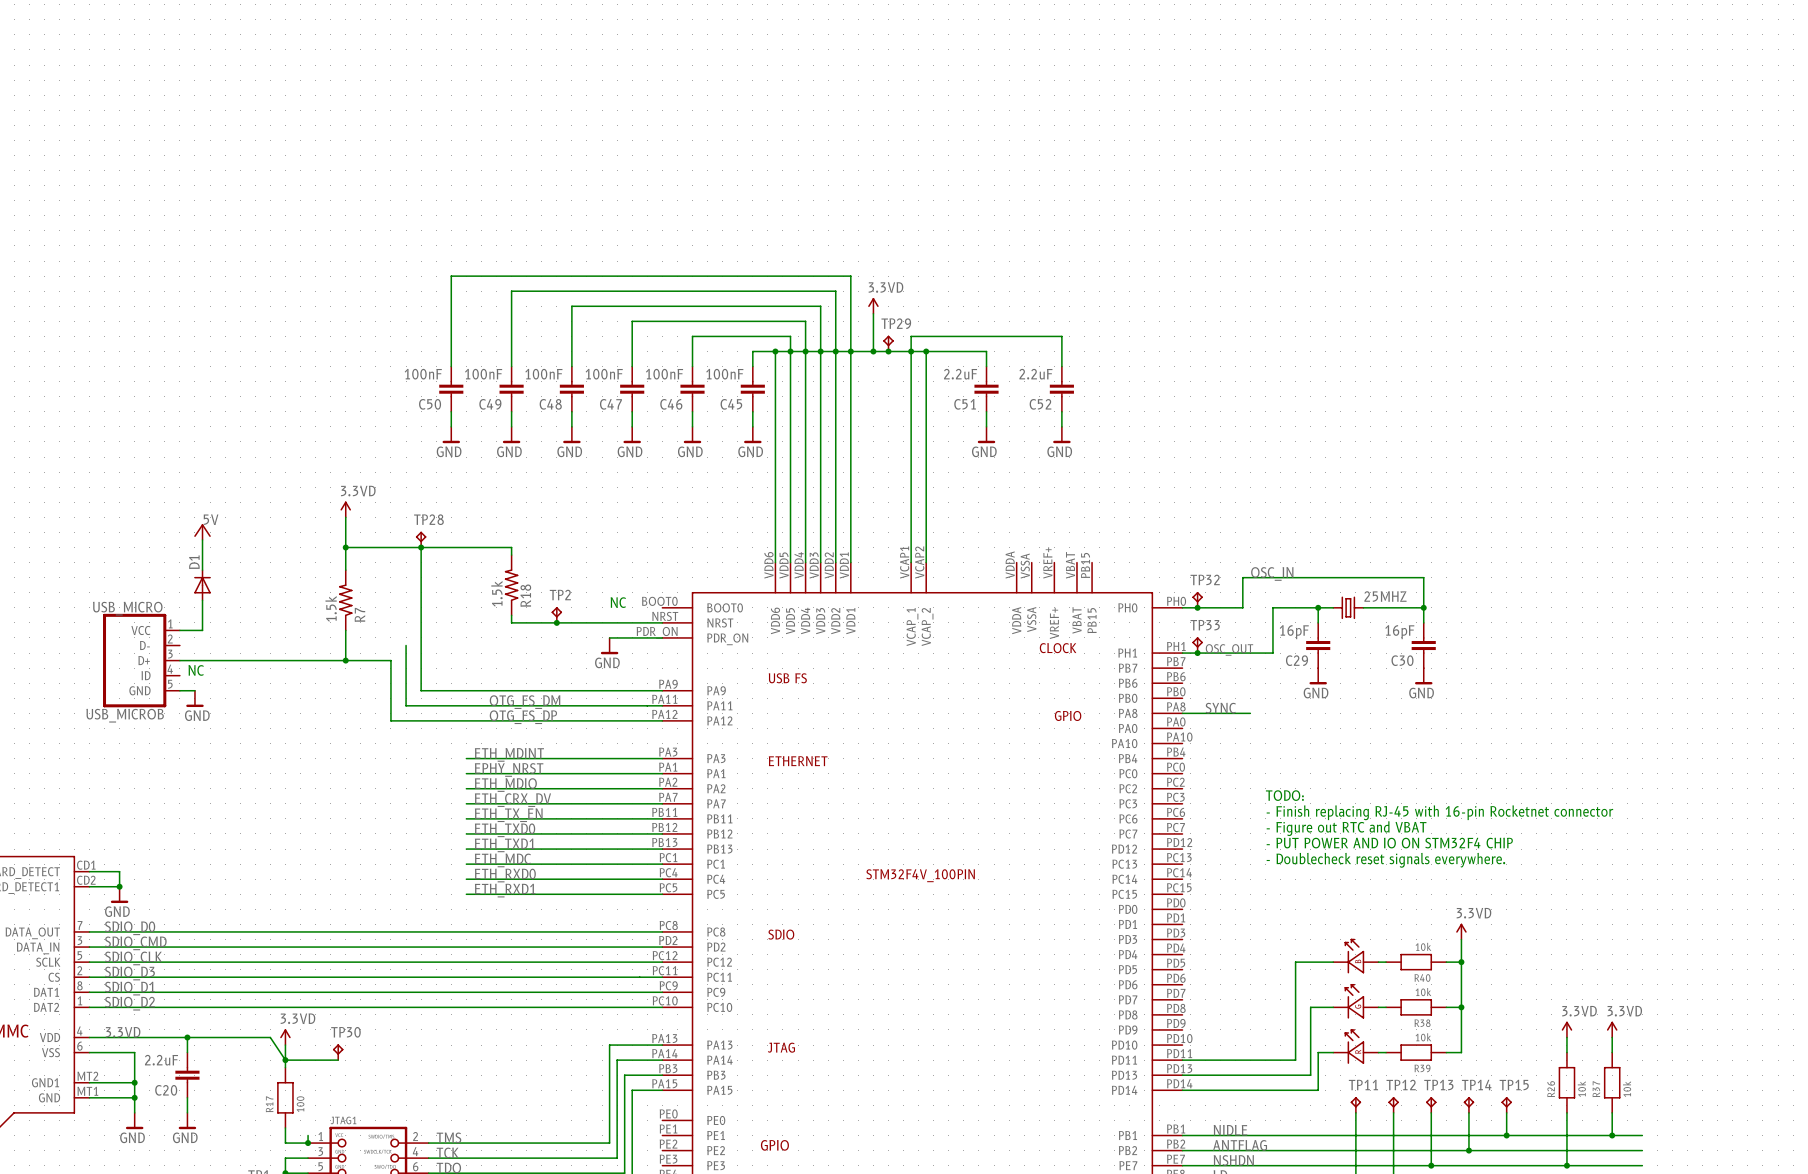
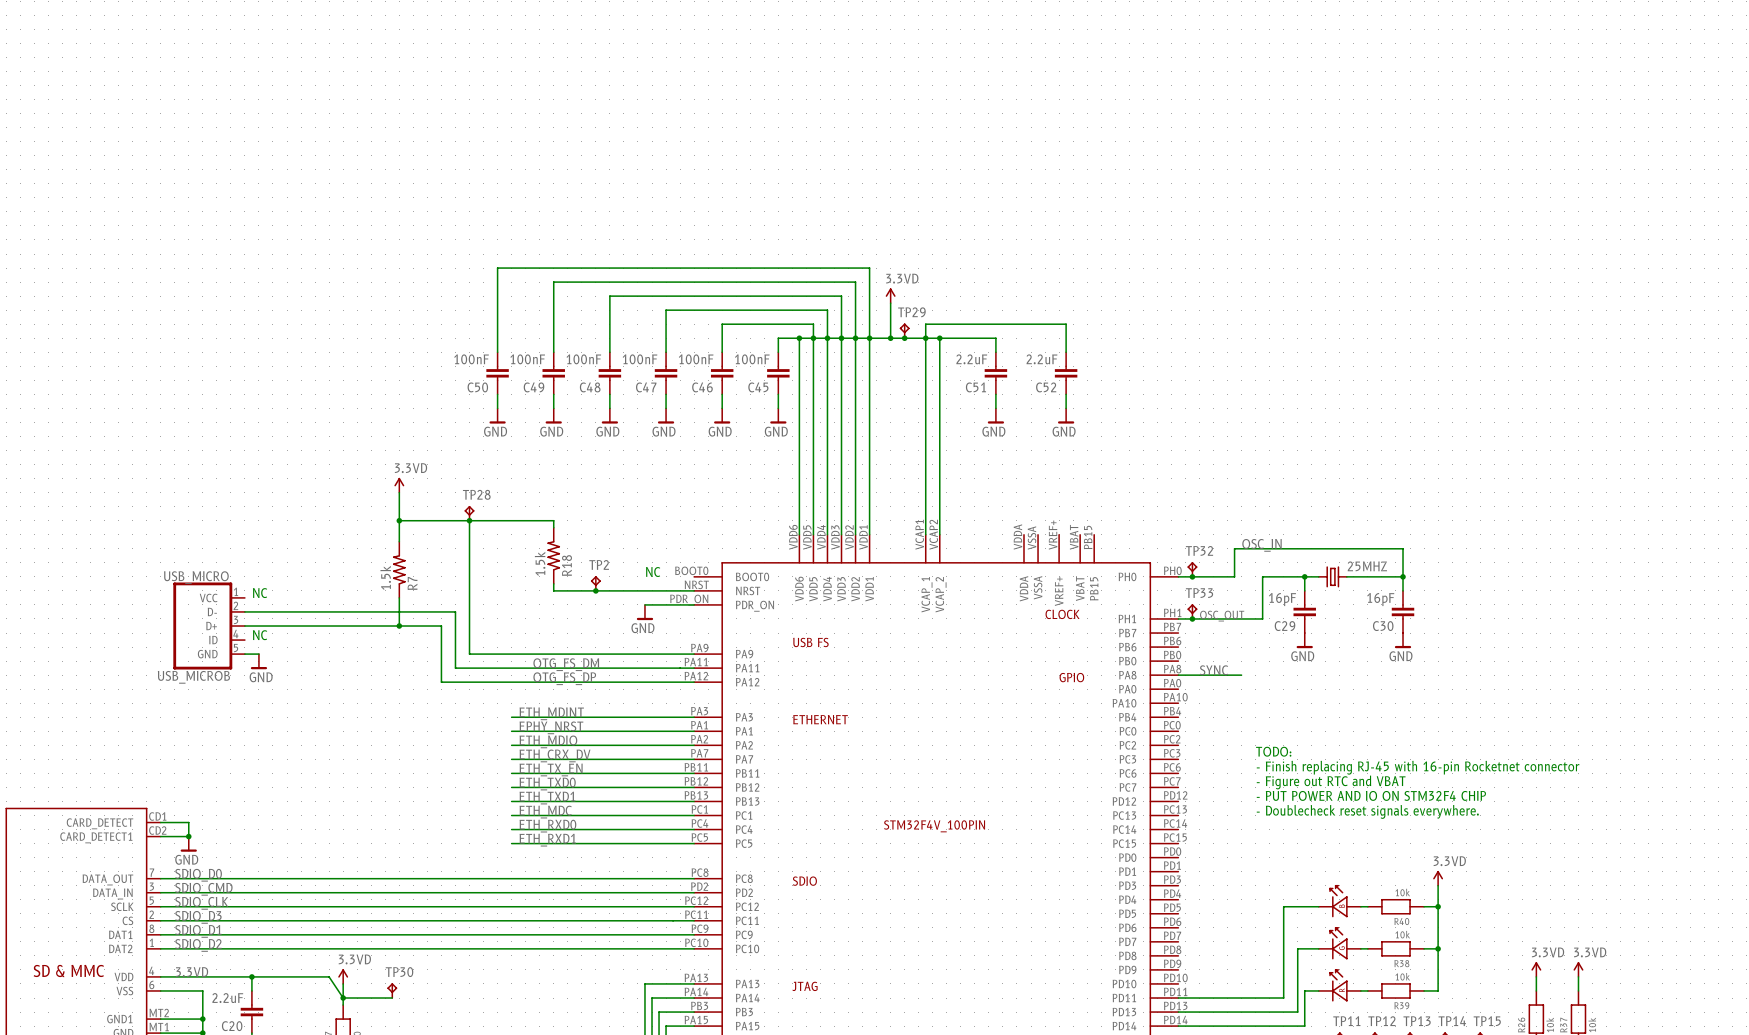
power symbol: 5V (202, 532) -> none
wire: (202, 539) (202, 570) -> none
D1: (202, 585) -> none
wire: (202, 600) (202, 630) (179, 630) -> none
text: none -> NC (260, 593)
wire: none -> (244, 611) (455, 611)

